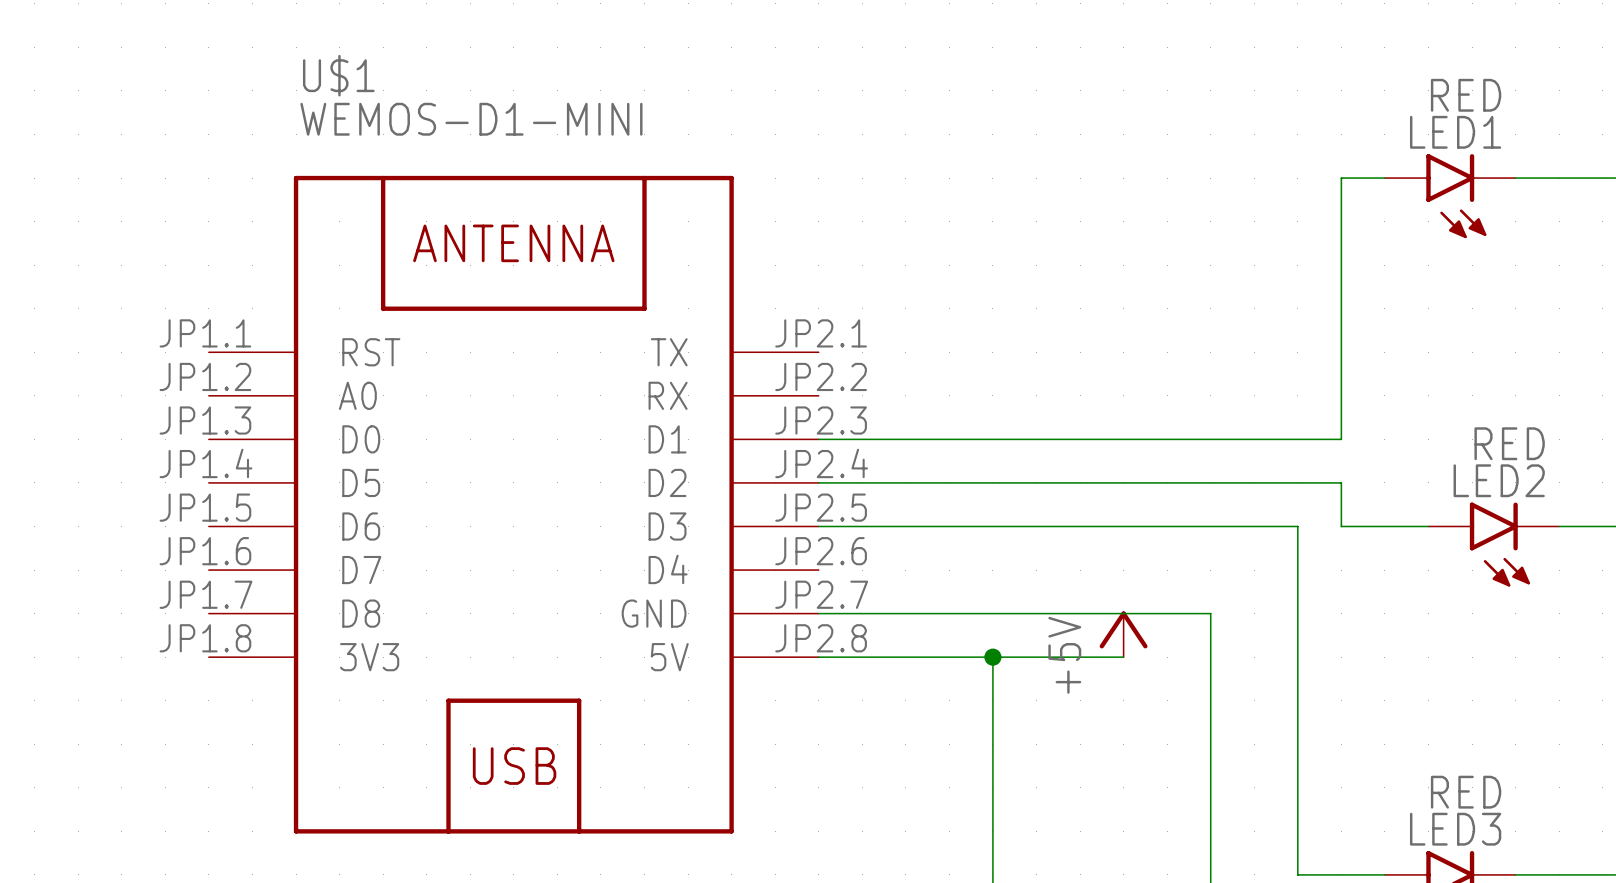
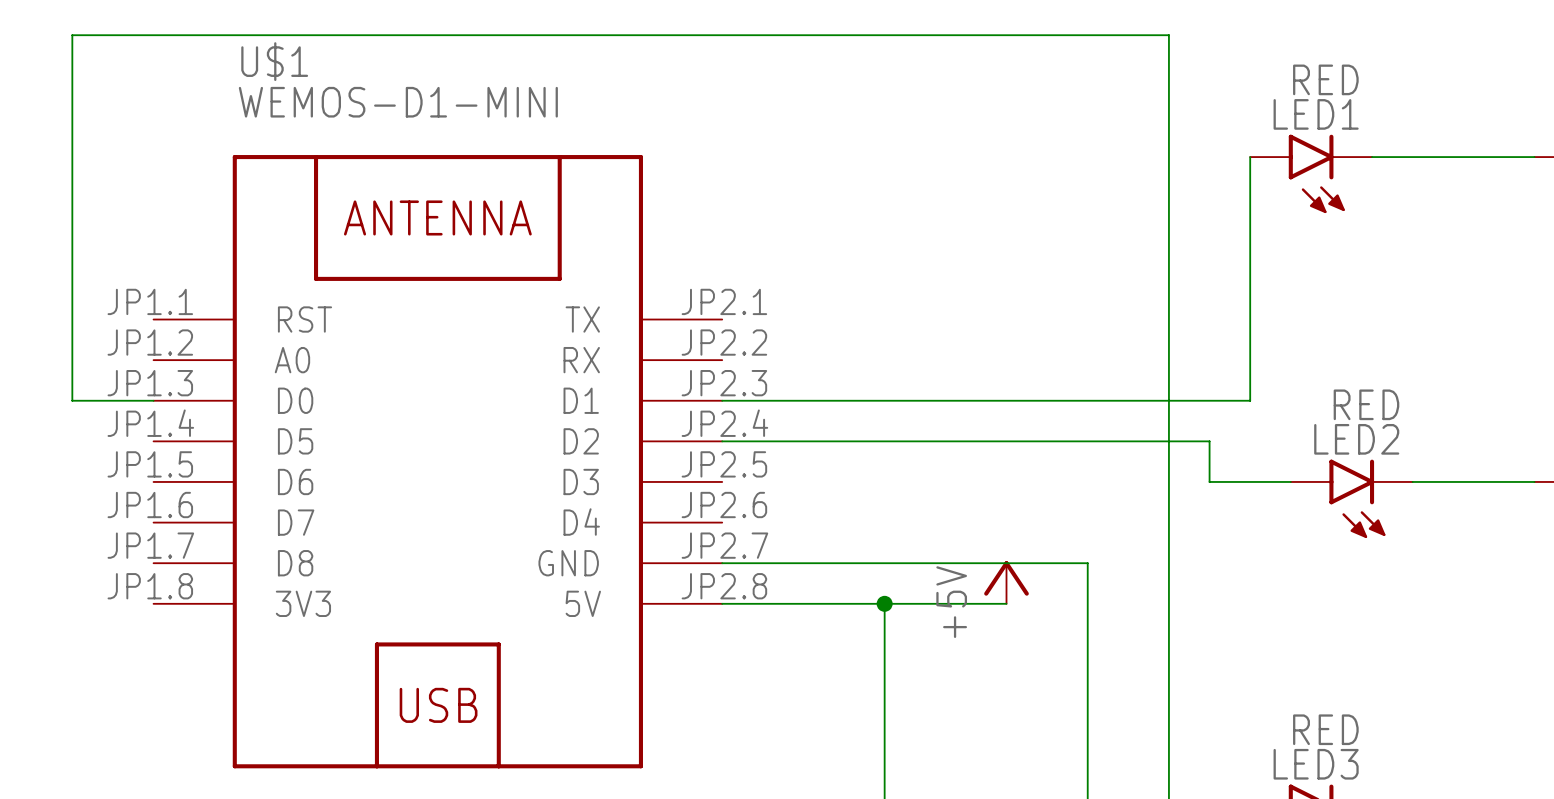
wire: (1384, 178) (1341, 178) (1341, 439) -> (1250, 157) (1250, 400) (1209, 400)
wire: (818, 526) (1297, 526) -> (153, 400) (72, 400) (72, 35) (1168, 35) (1168, 481)

